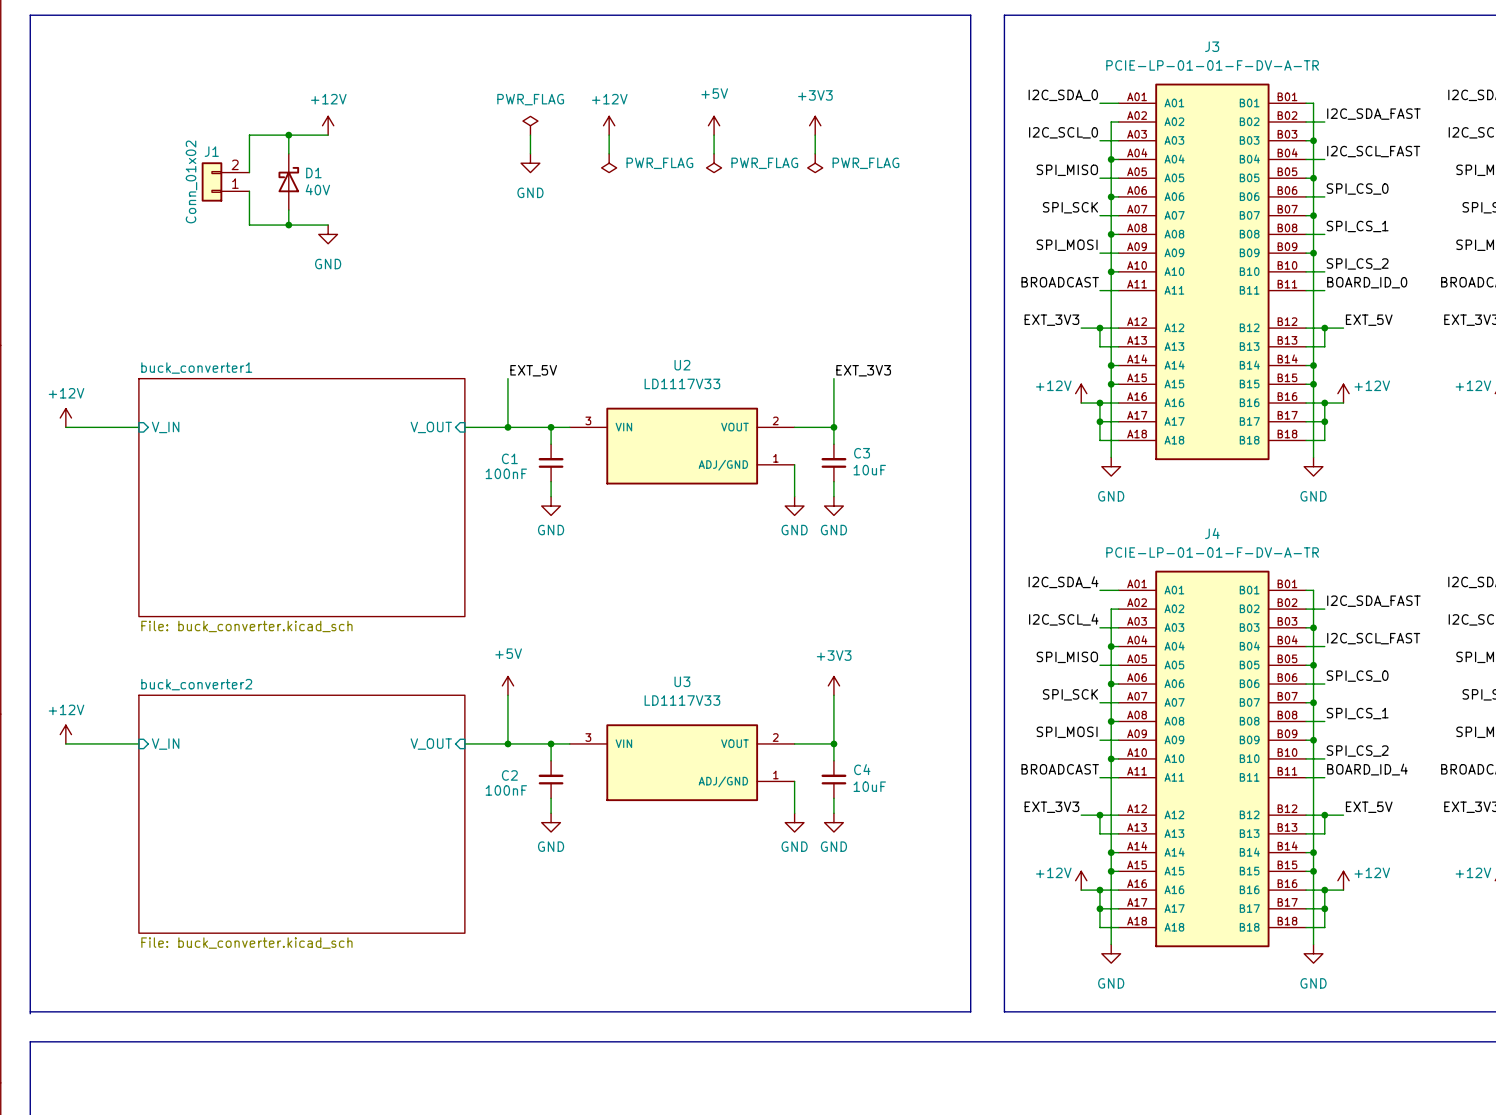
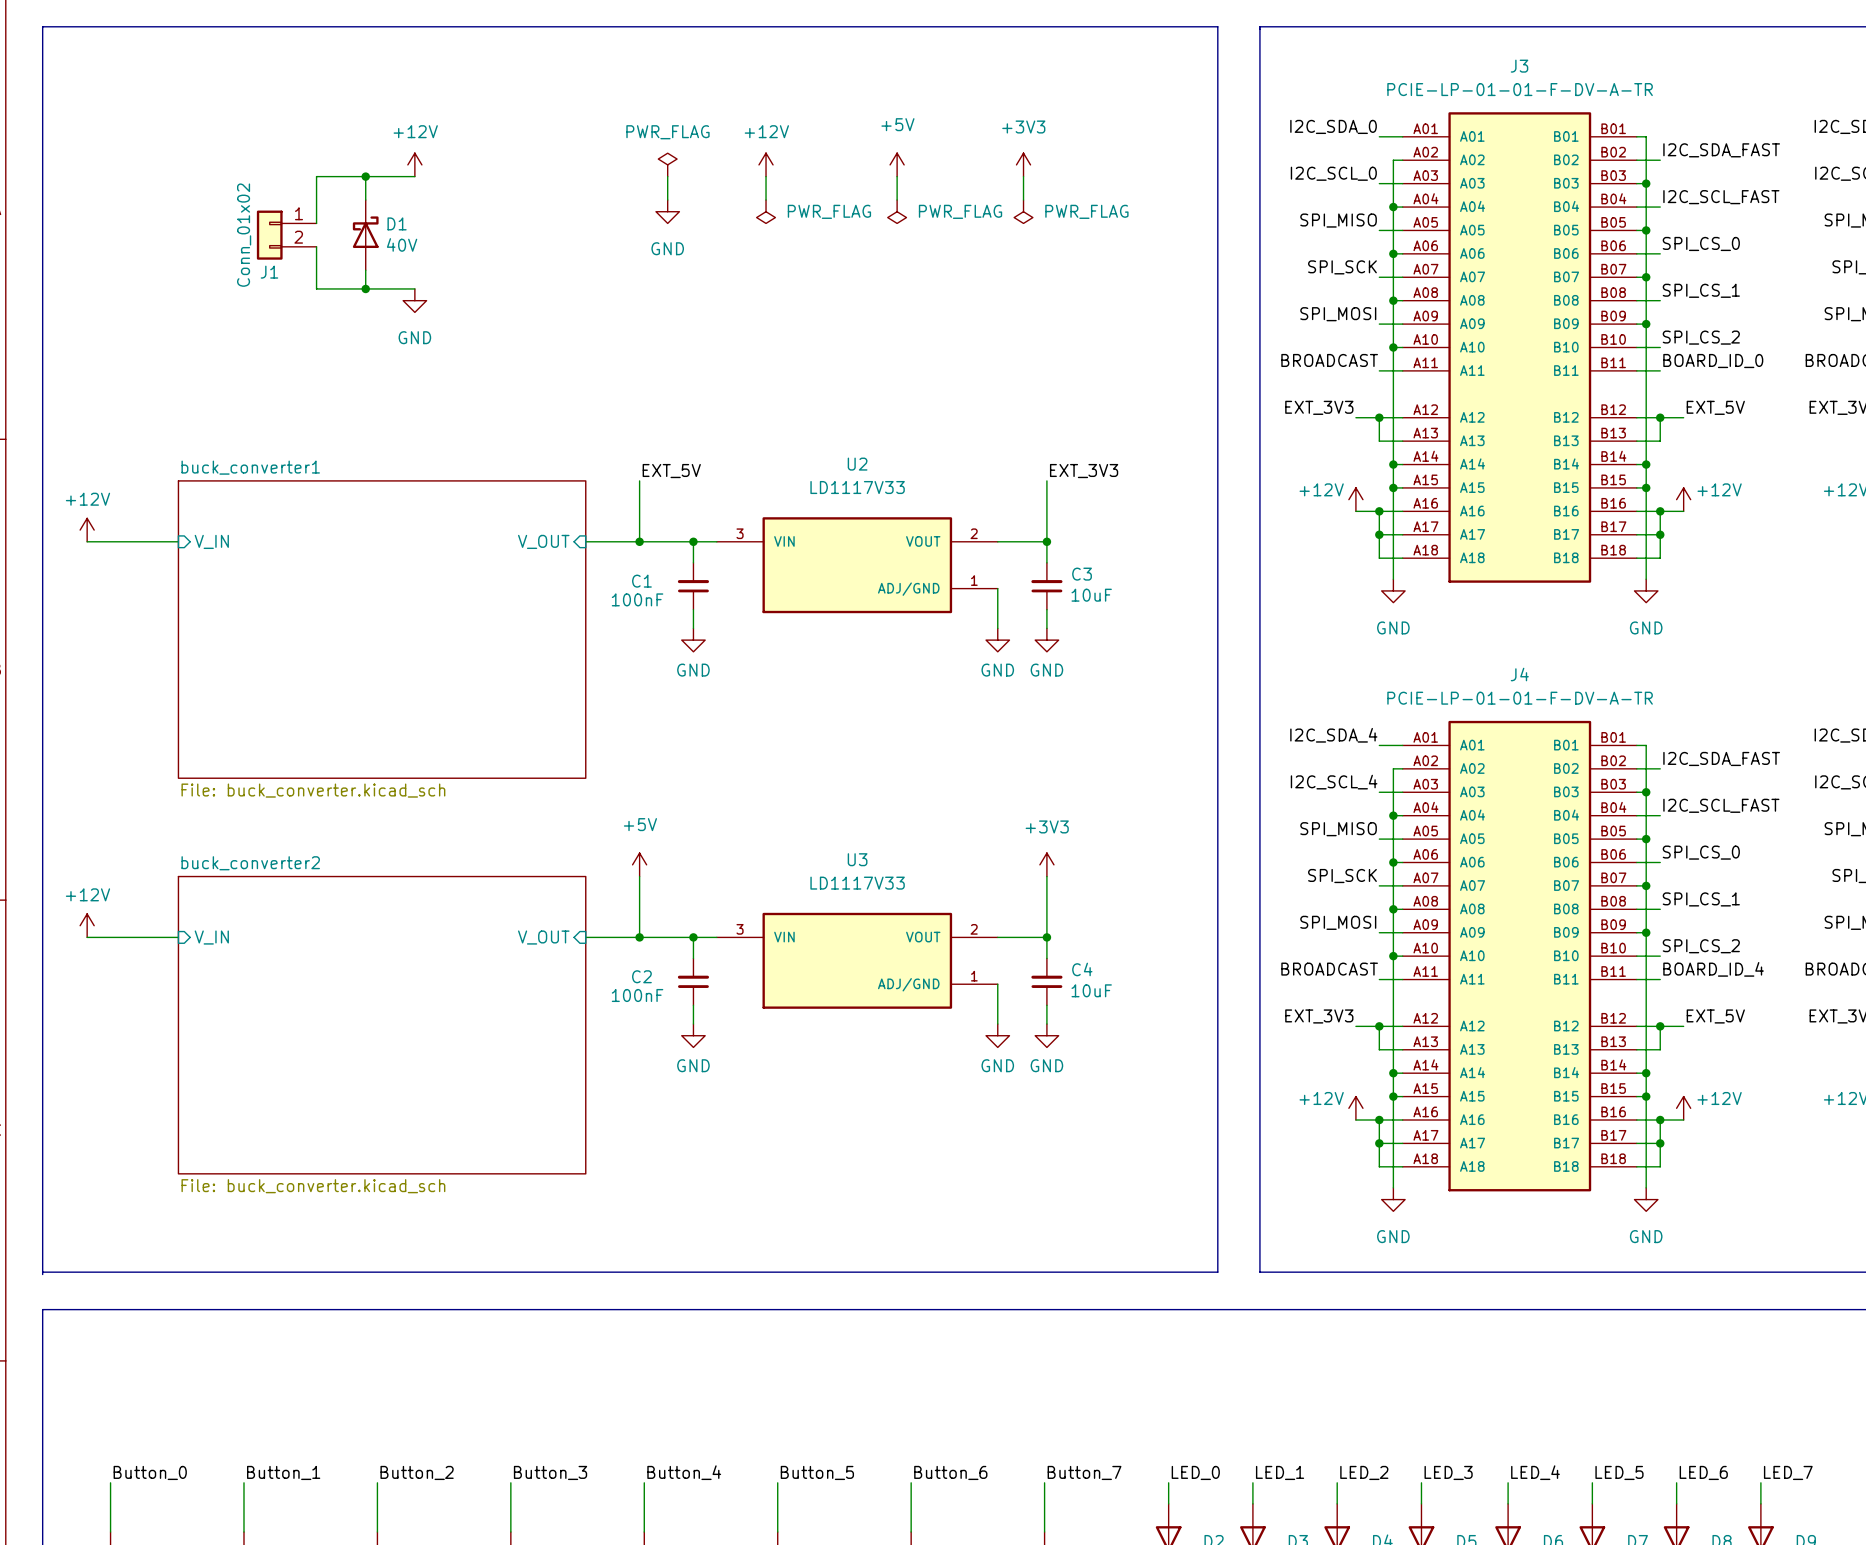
J1 flip: as is (211, 181) -> up-down (269, 235)

